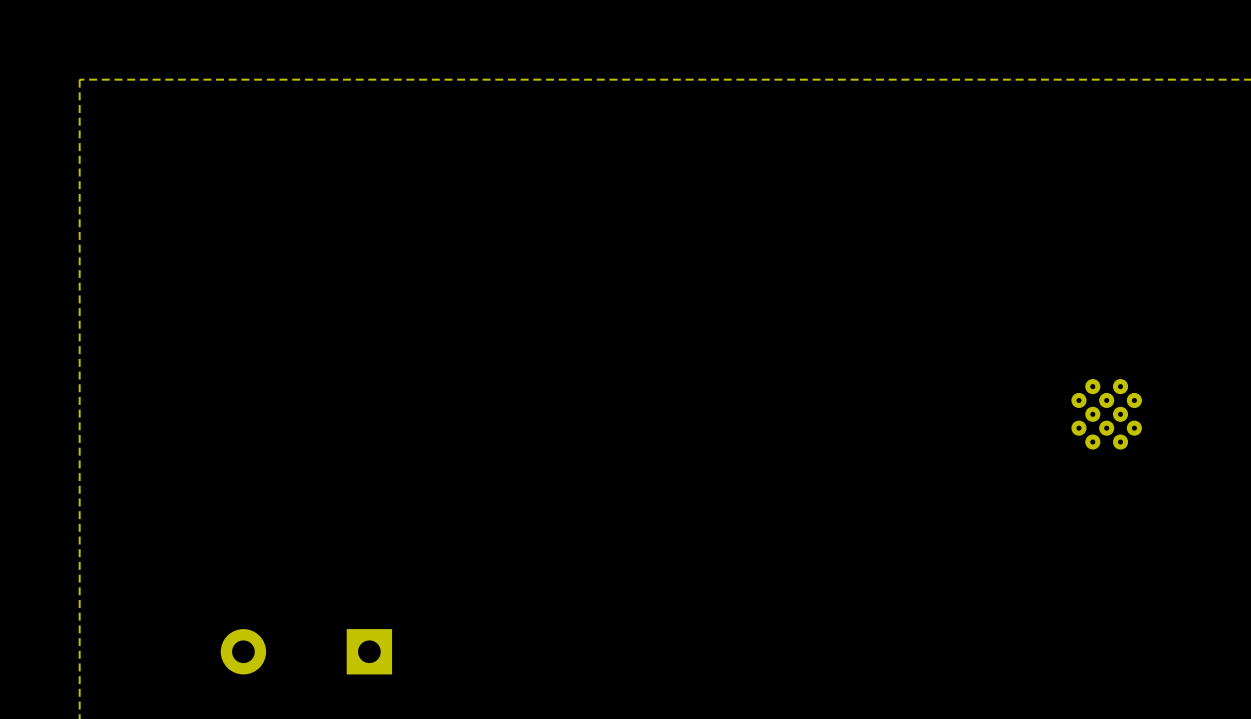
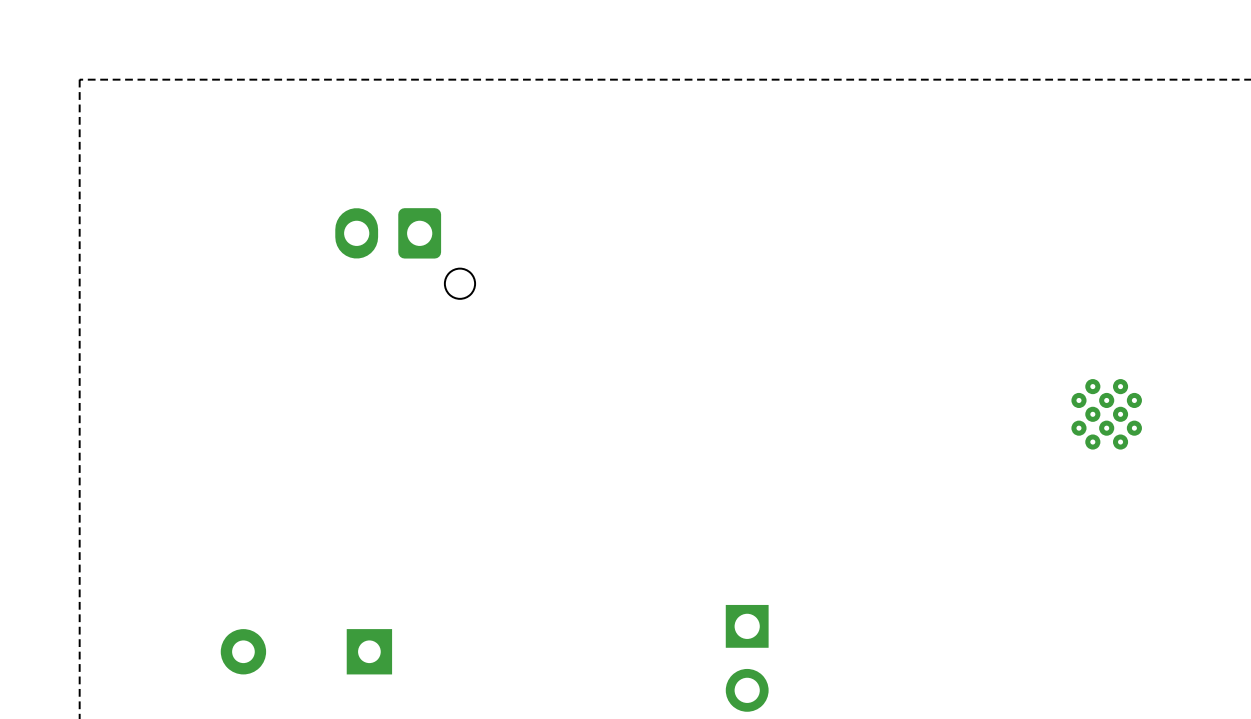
part: none -> (405, 253)
part: none -> (747, 658)

